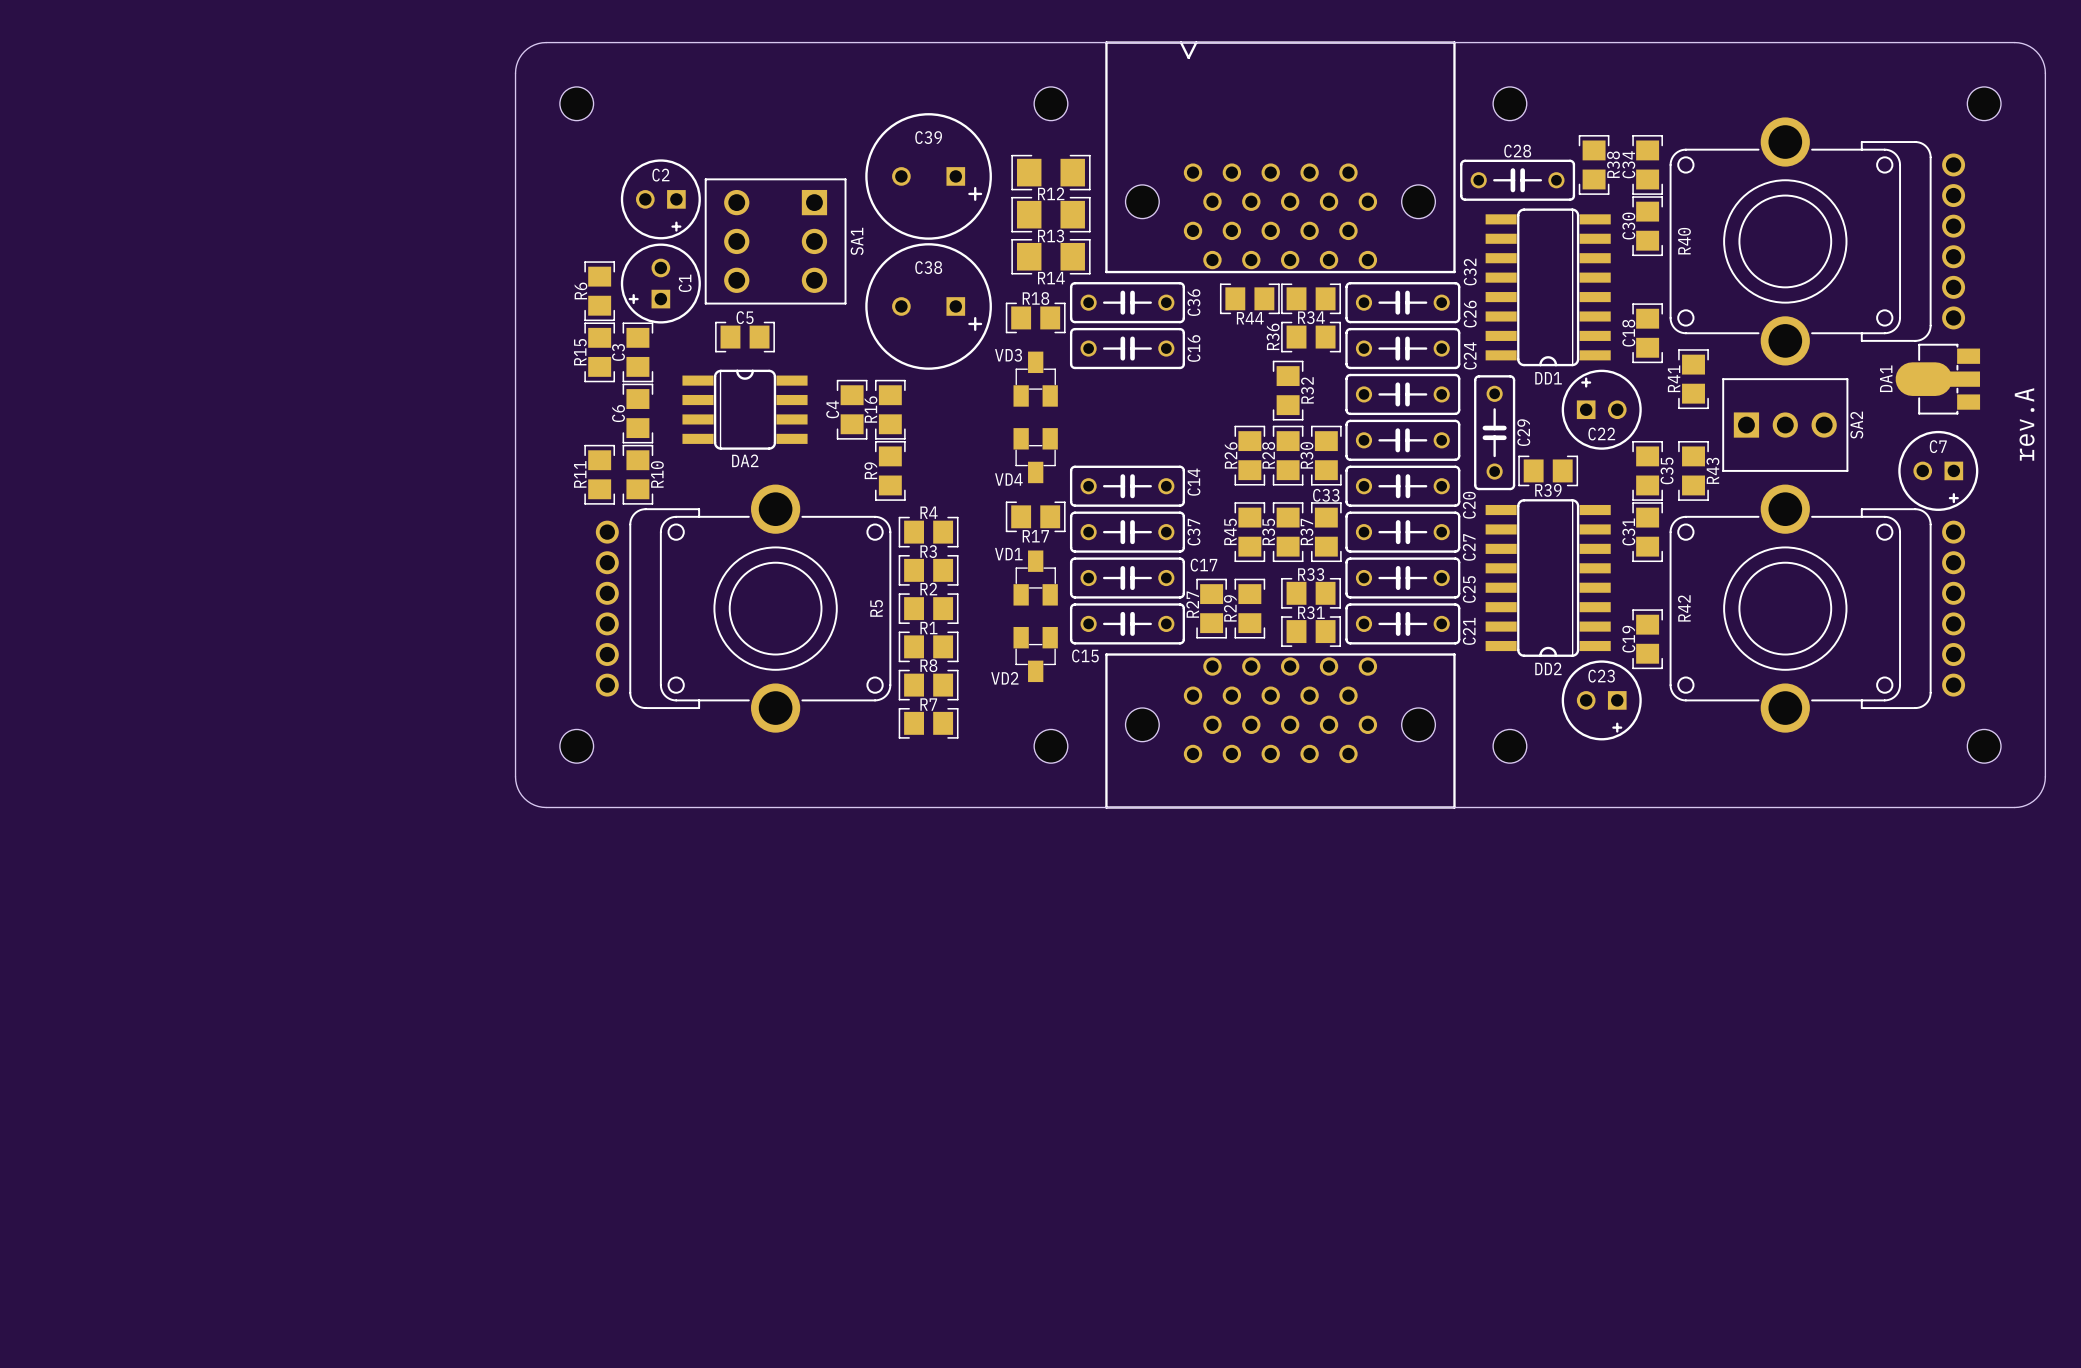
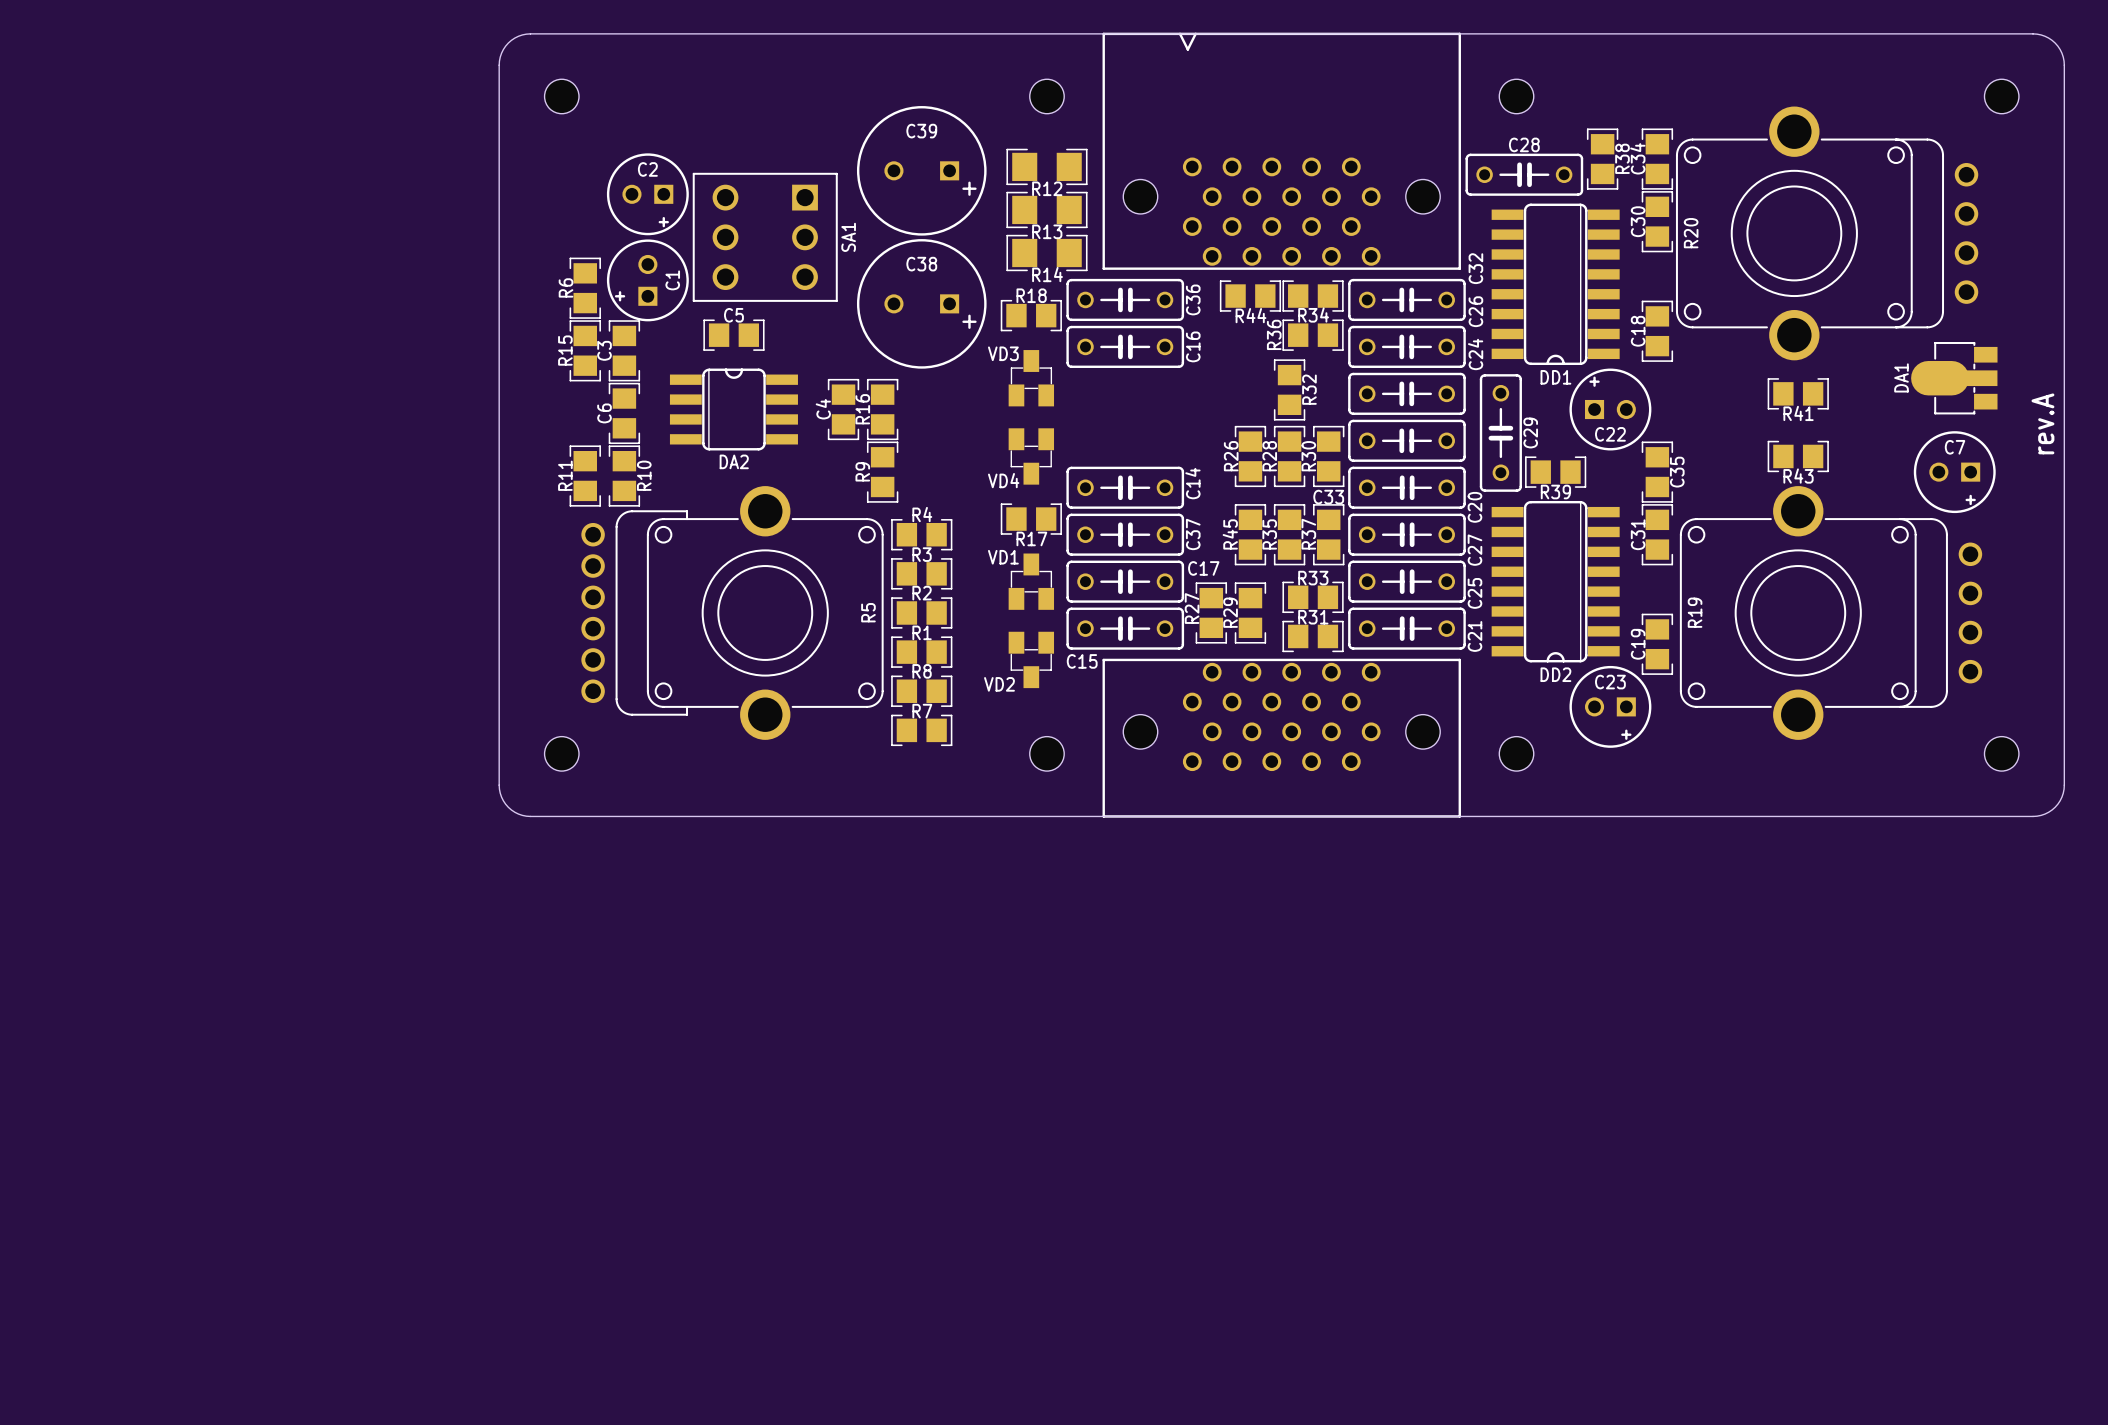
R20: none -> (1827, 233)
R40: (1817, 241) -> none
R41 rotation: 0° (1693, 379) -> 90° clockwise (1798, 393)
R41 position: (1693, 379) -> (1798, 393)
SA2: (1785, 425) -> none
R43 rotation: 0° (1693, 470) -> 90° clockwise (1798, 456)
R43 position: (1693, 470) -> (1798, 456)
R42: (1817, 608) -> none
R19: none -> (1831, 612)

